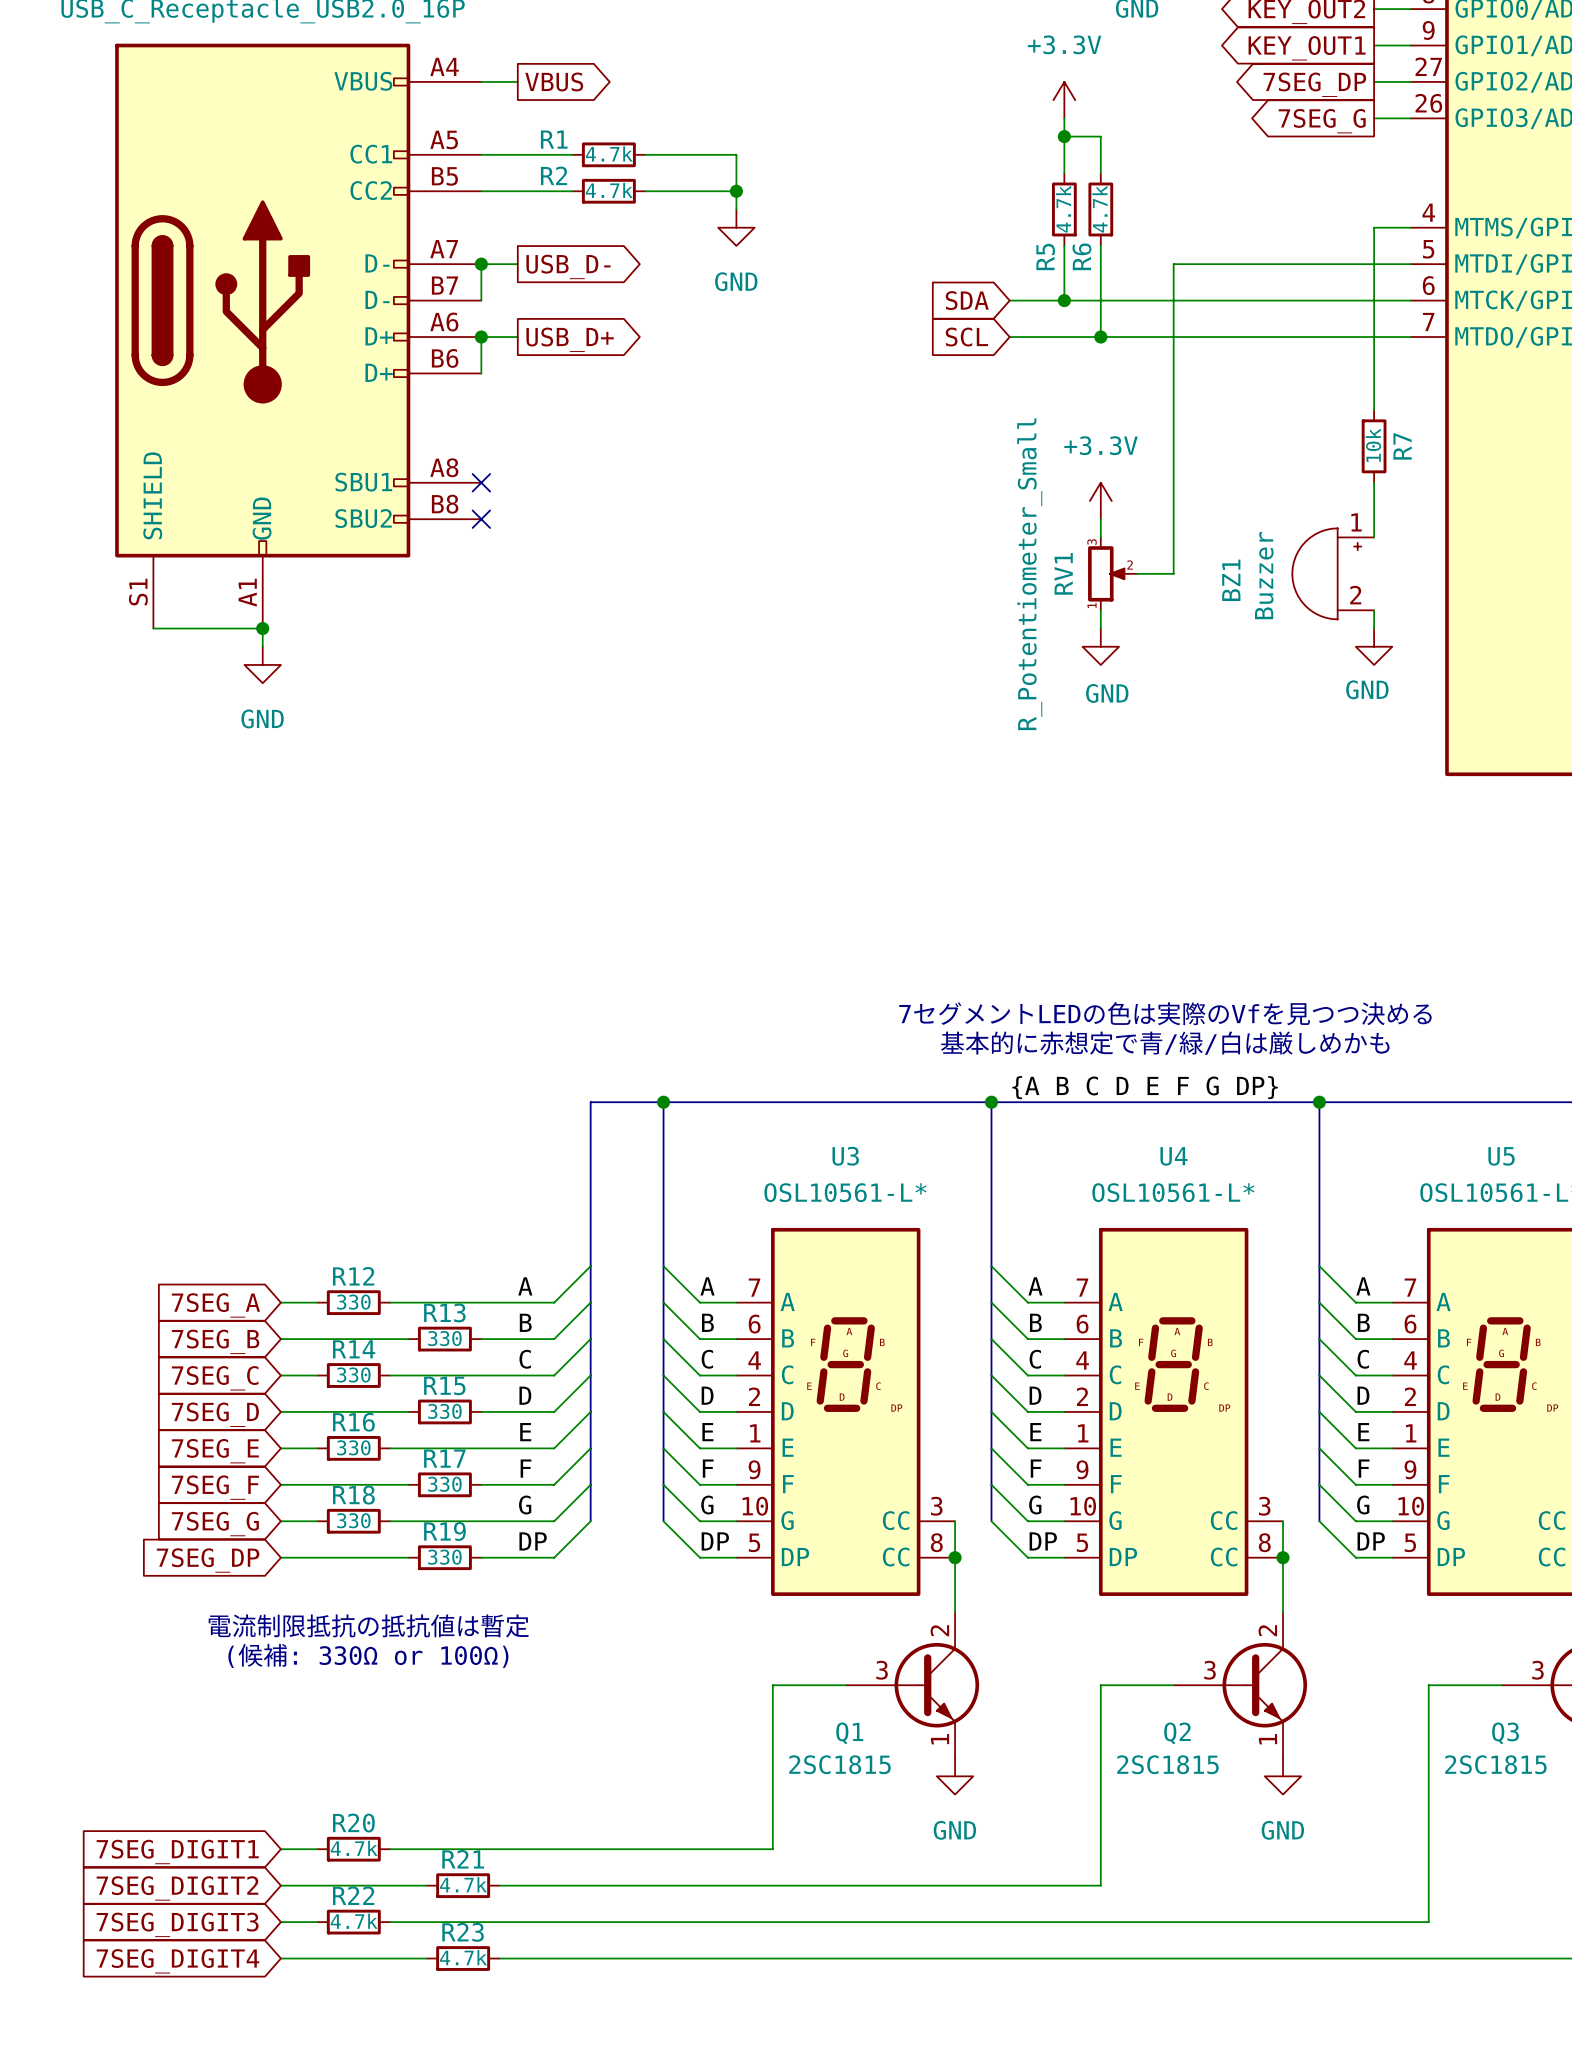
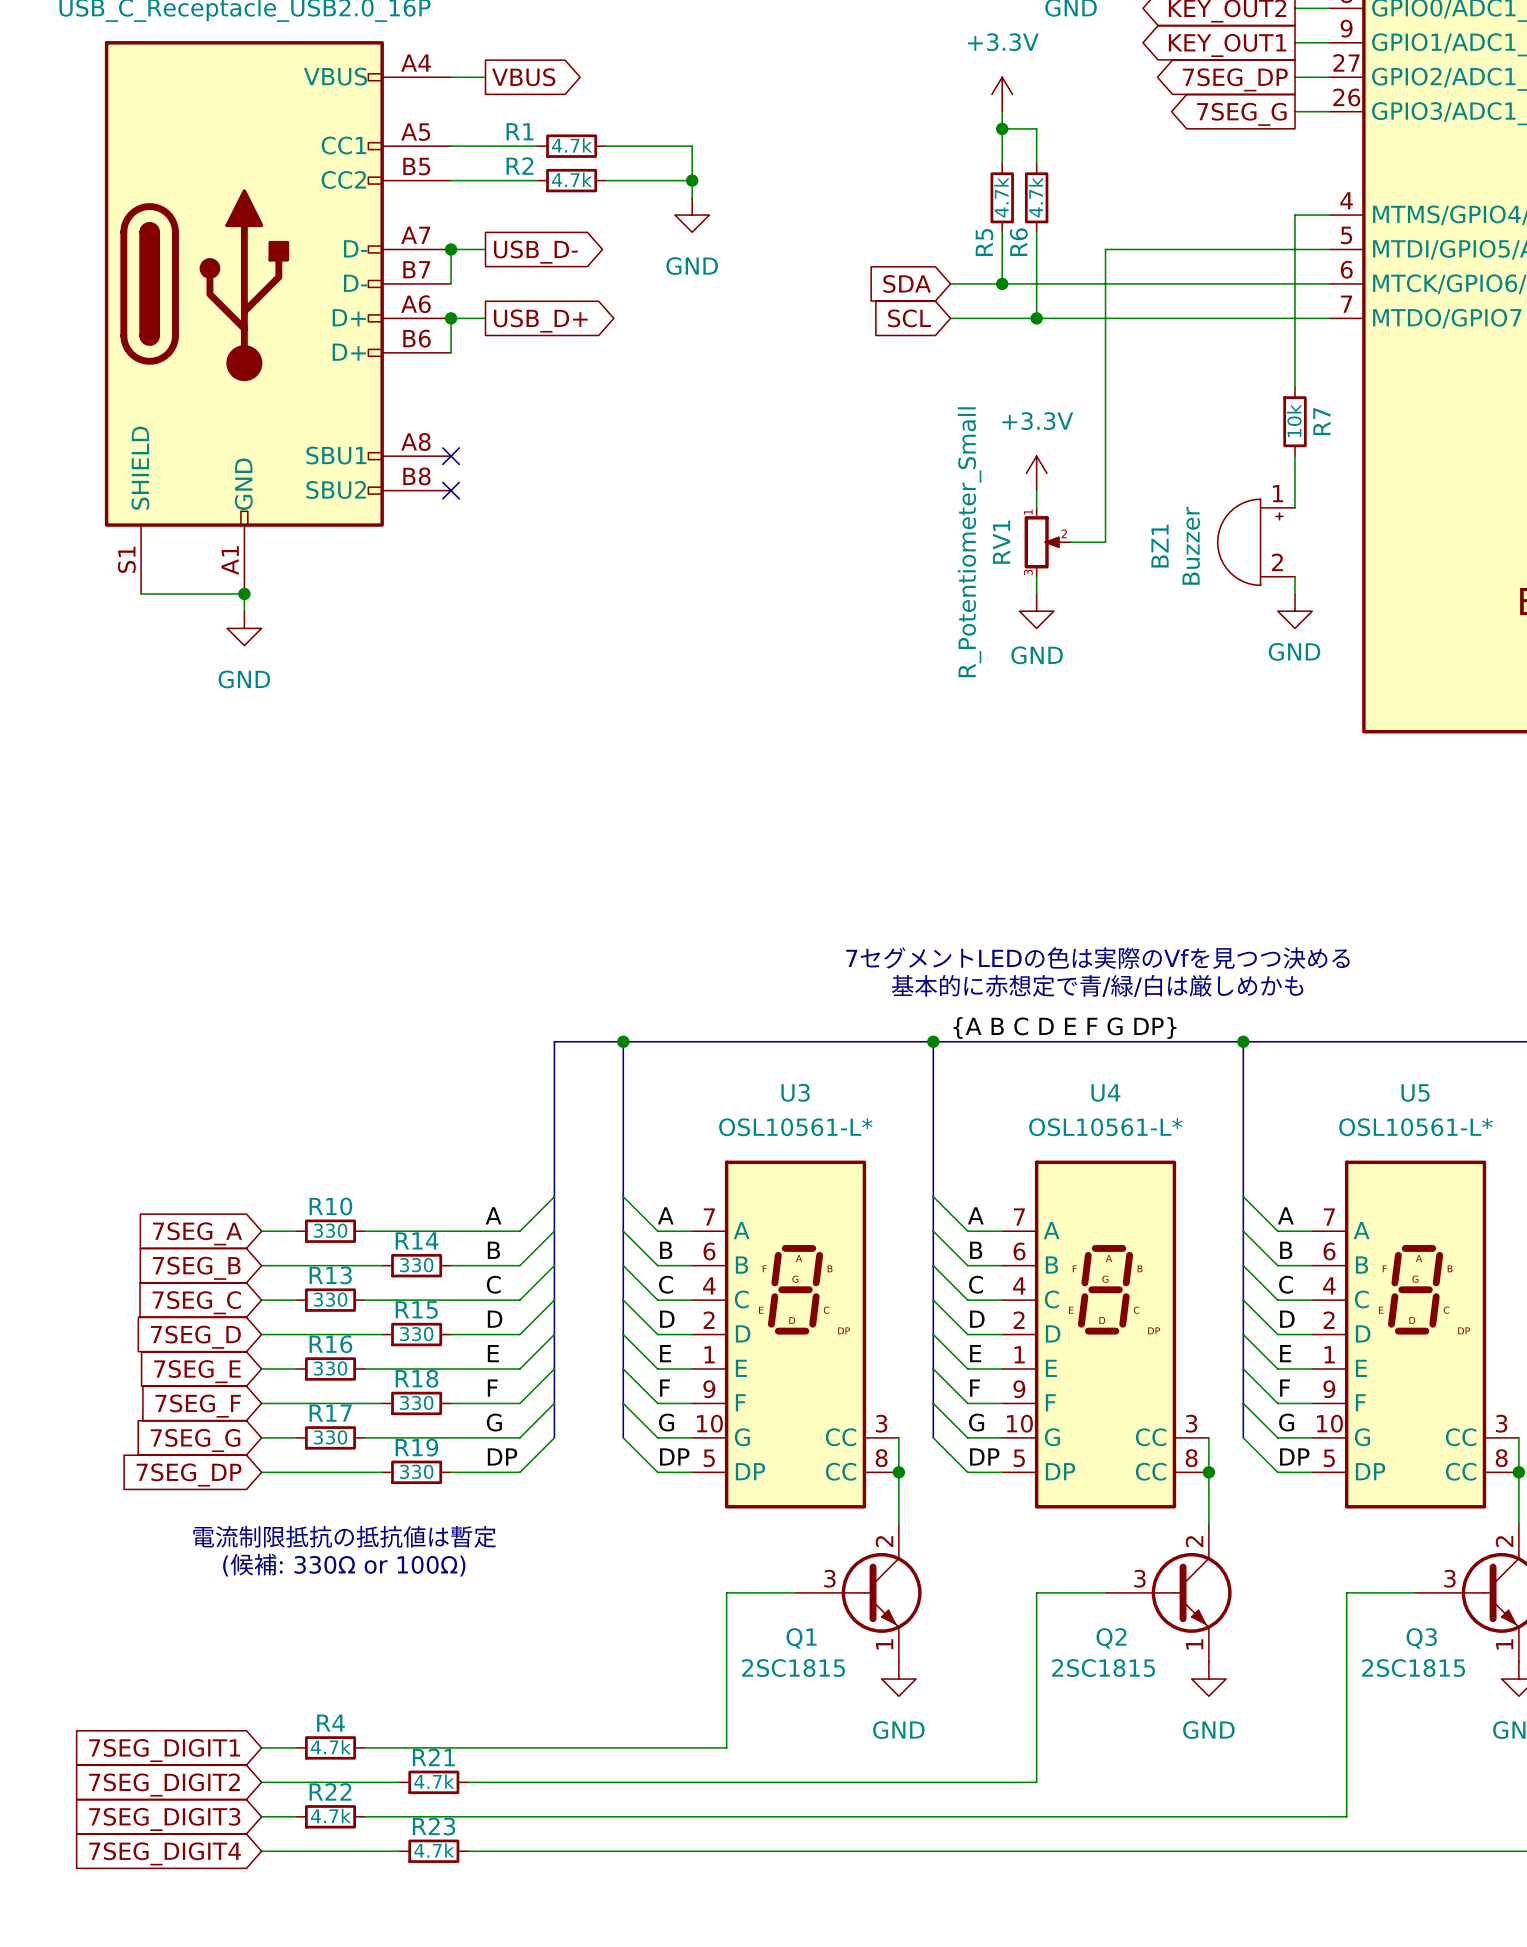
RV1 flip: as is (1106, 573) -> up-down (1041, 542)
R12 name: R12 (353, 1276) -> R10 (330, 1206)
R13 name: R13 (444, 1312) -> R14 (417, 1240)
R14 name: R14 (354, 1349) -> R13 (330, 1275)
R17 name: R17 (444, 1458) -> R18 (416, 1378)
R18 name: R18 (353, 1495) -> R17 (330, 1413)
R20 name: R20 (353, 1823) -> R4 (330, 1723)

